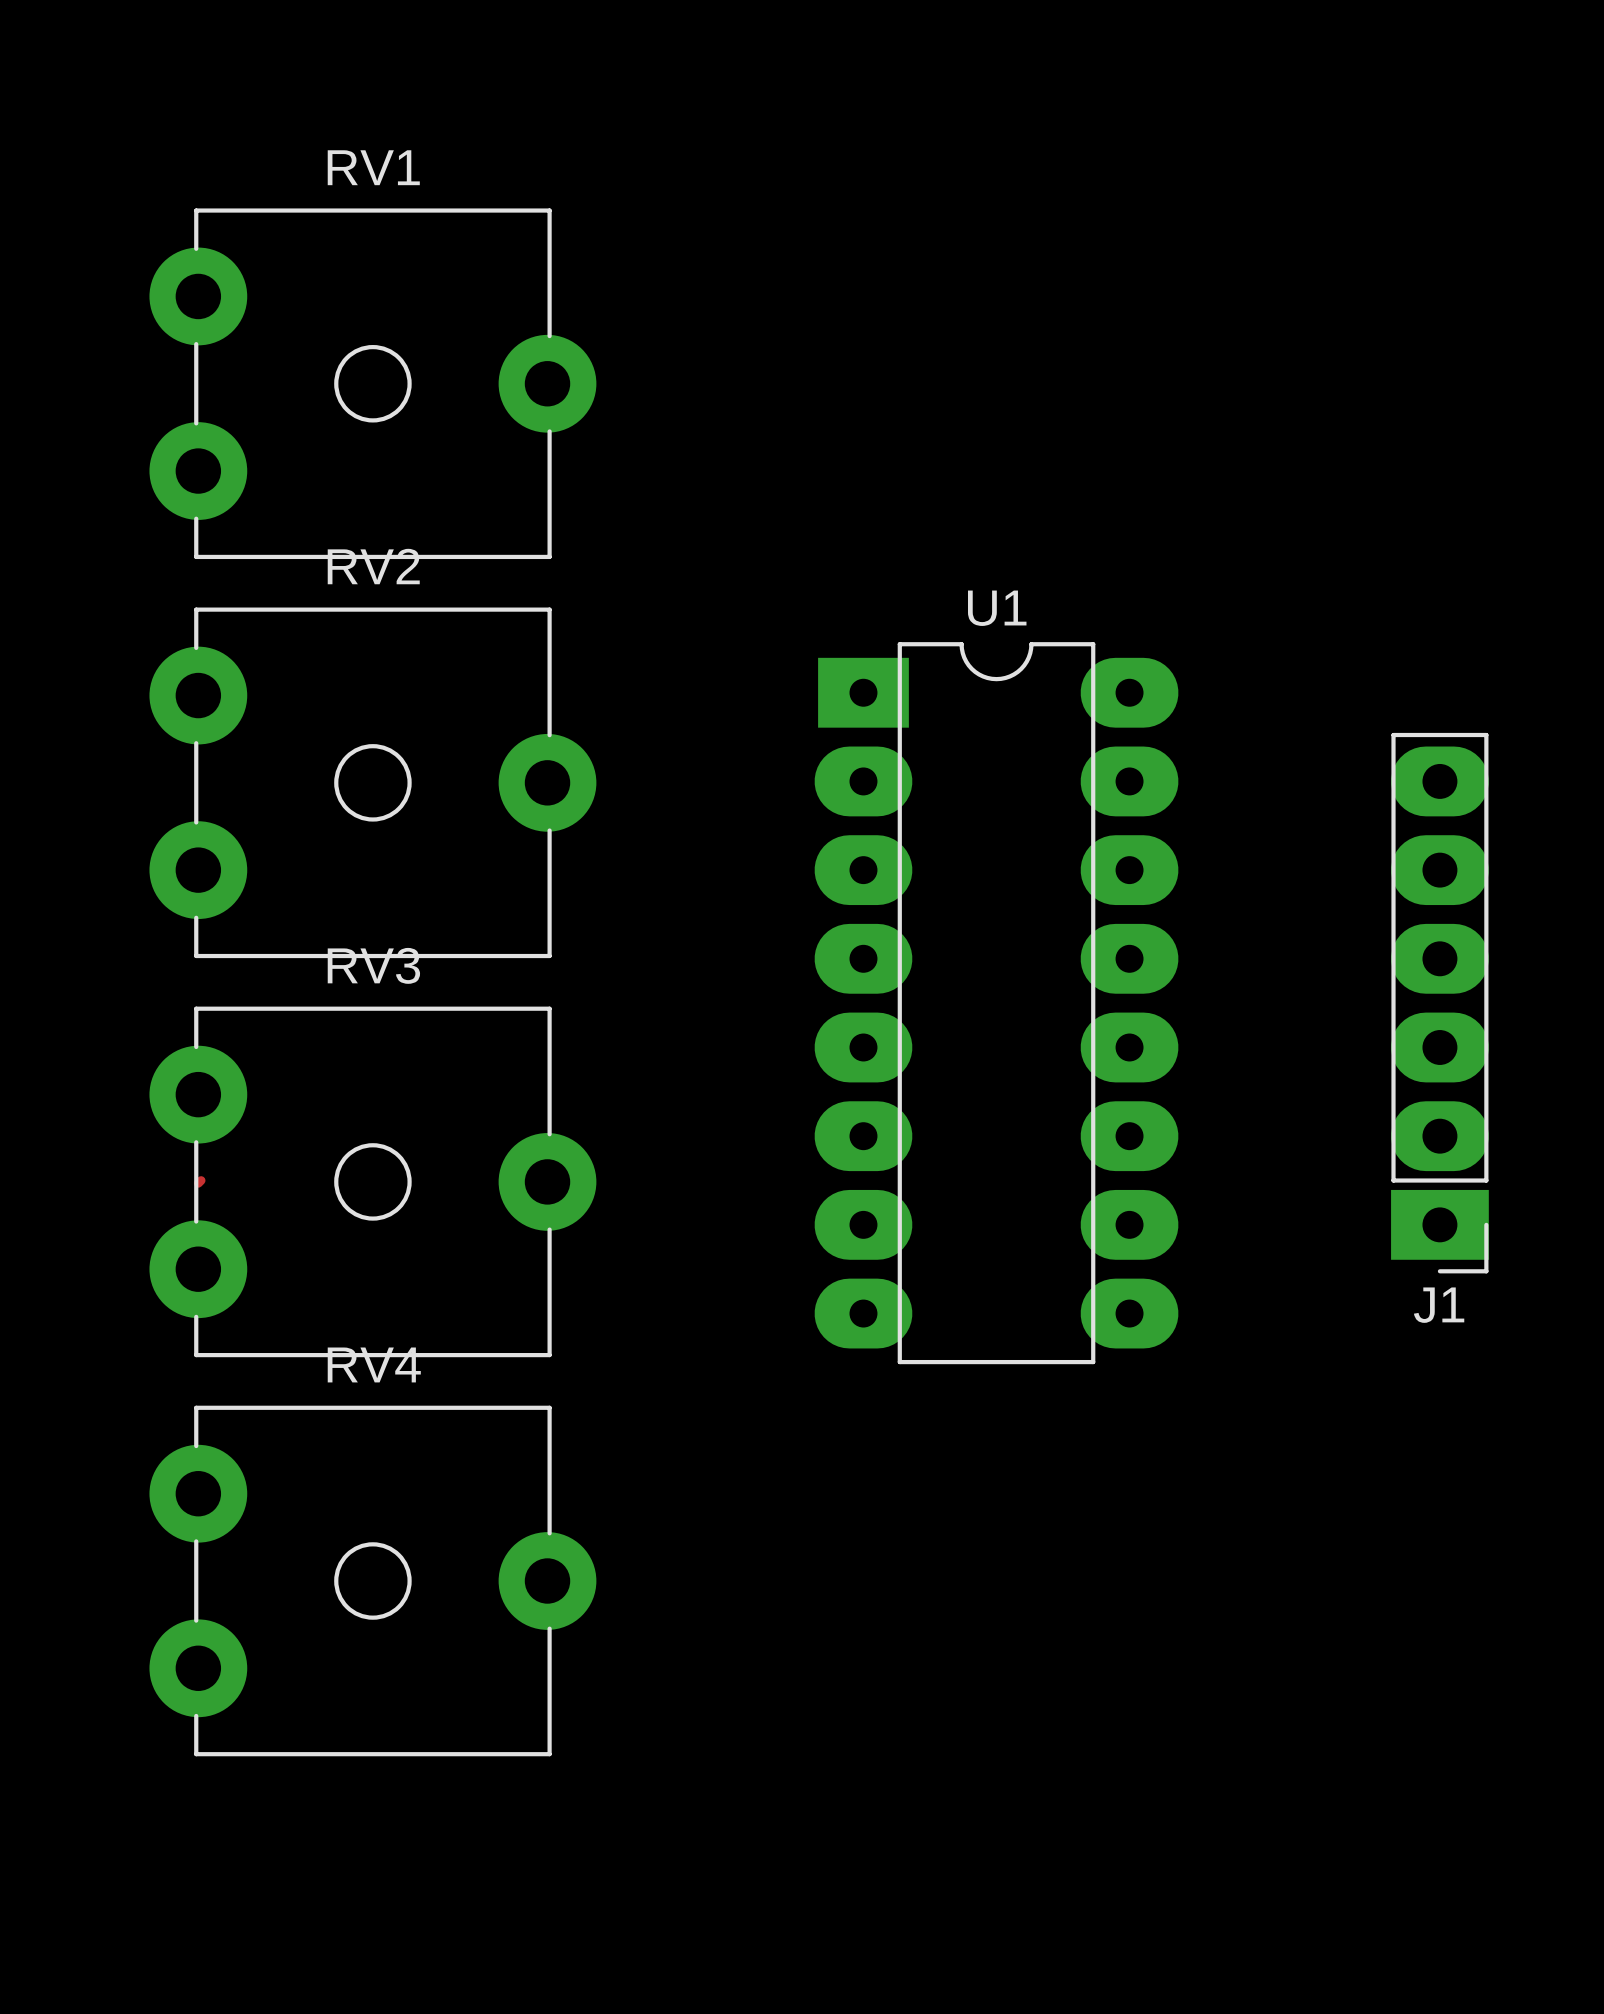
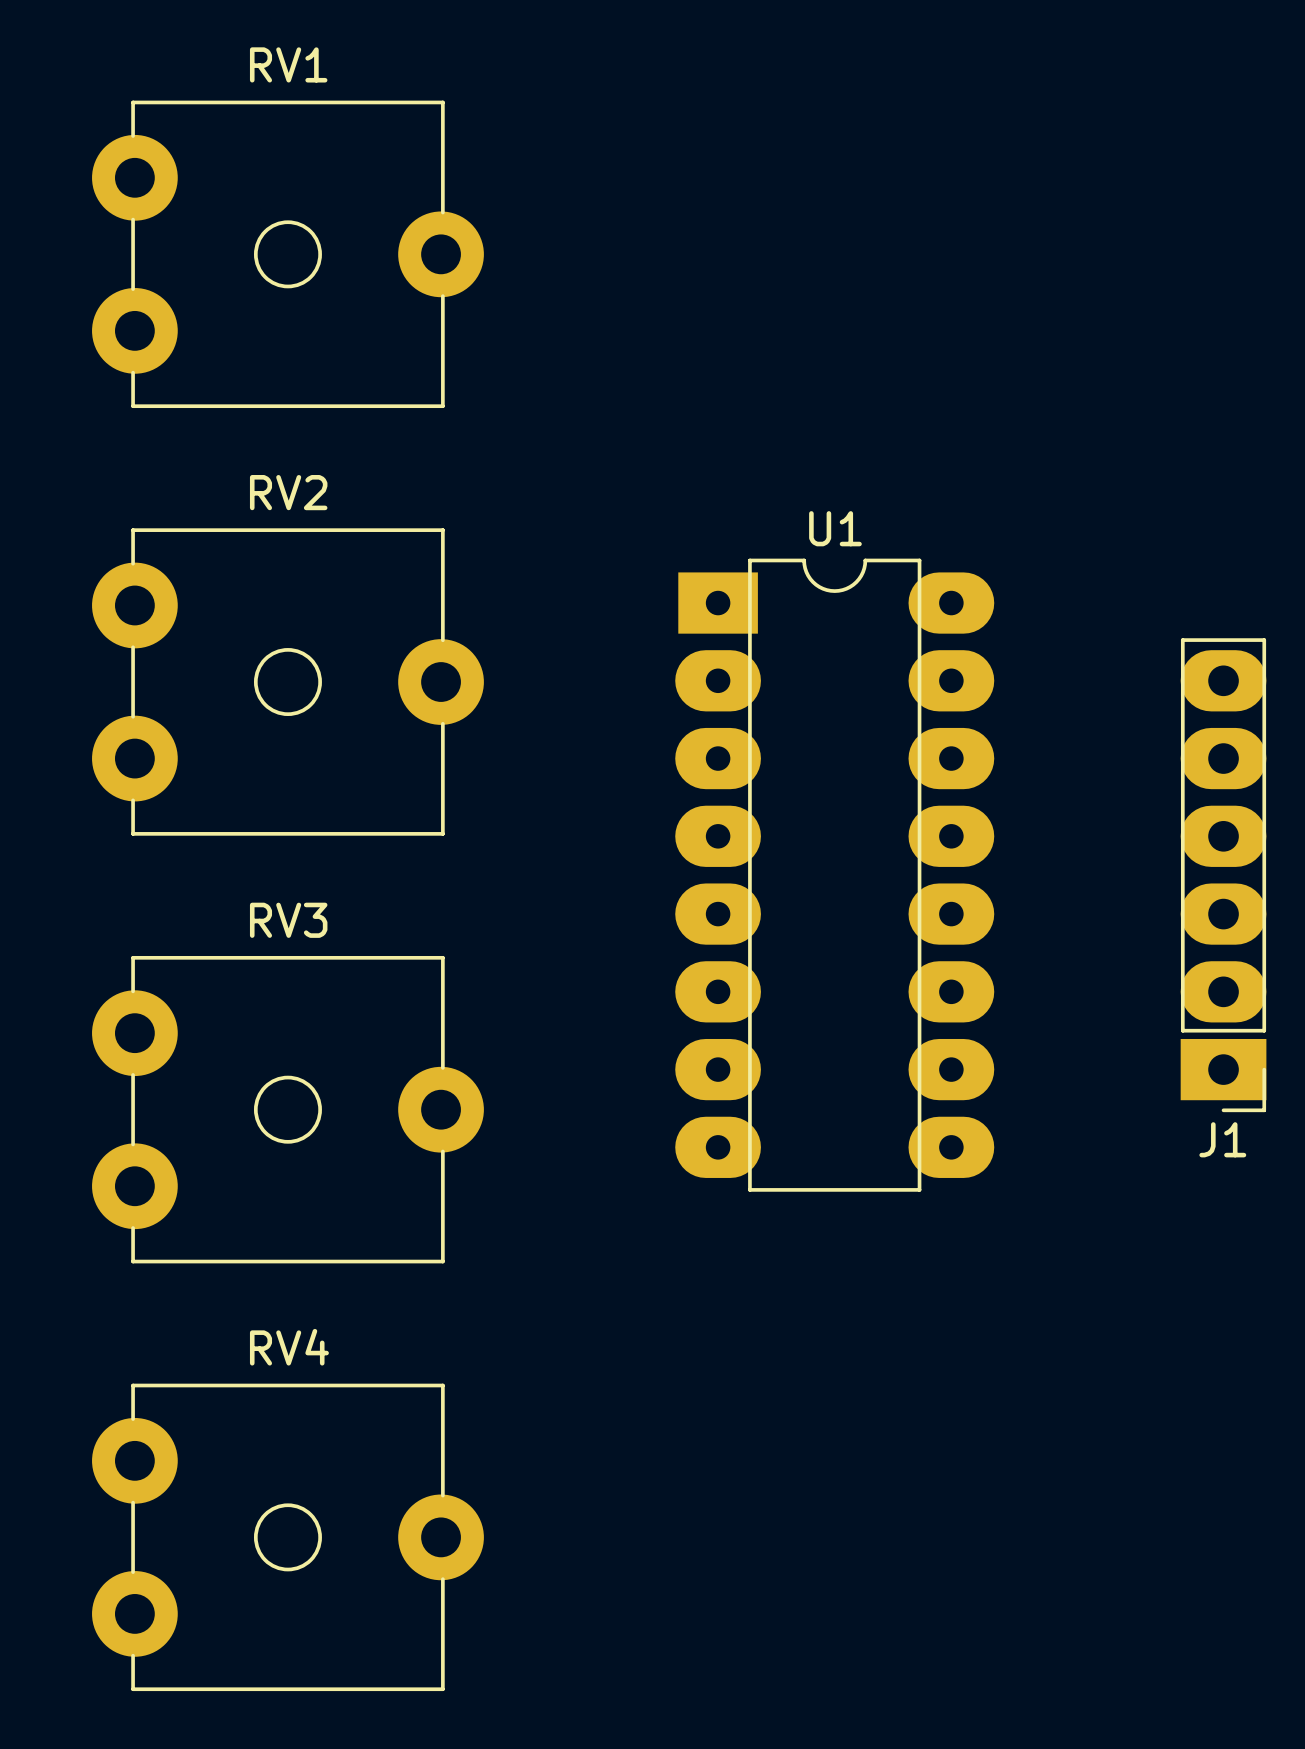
RV1 position: (372, 383) -> (287, 254)
RV3 position: (372, 1181) -> (287, 1109)
RV4 position: (372, 1580) -> (287, 1537)

